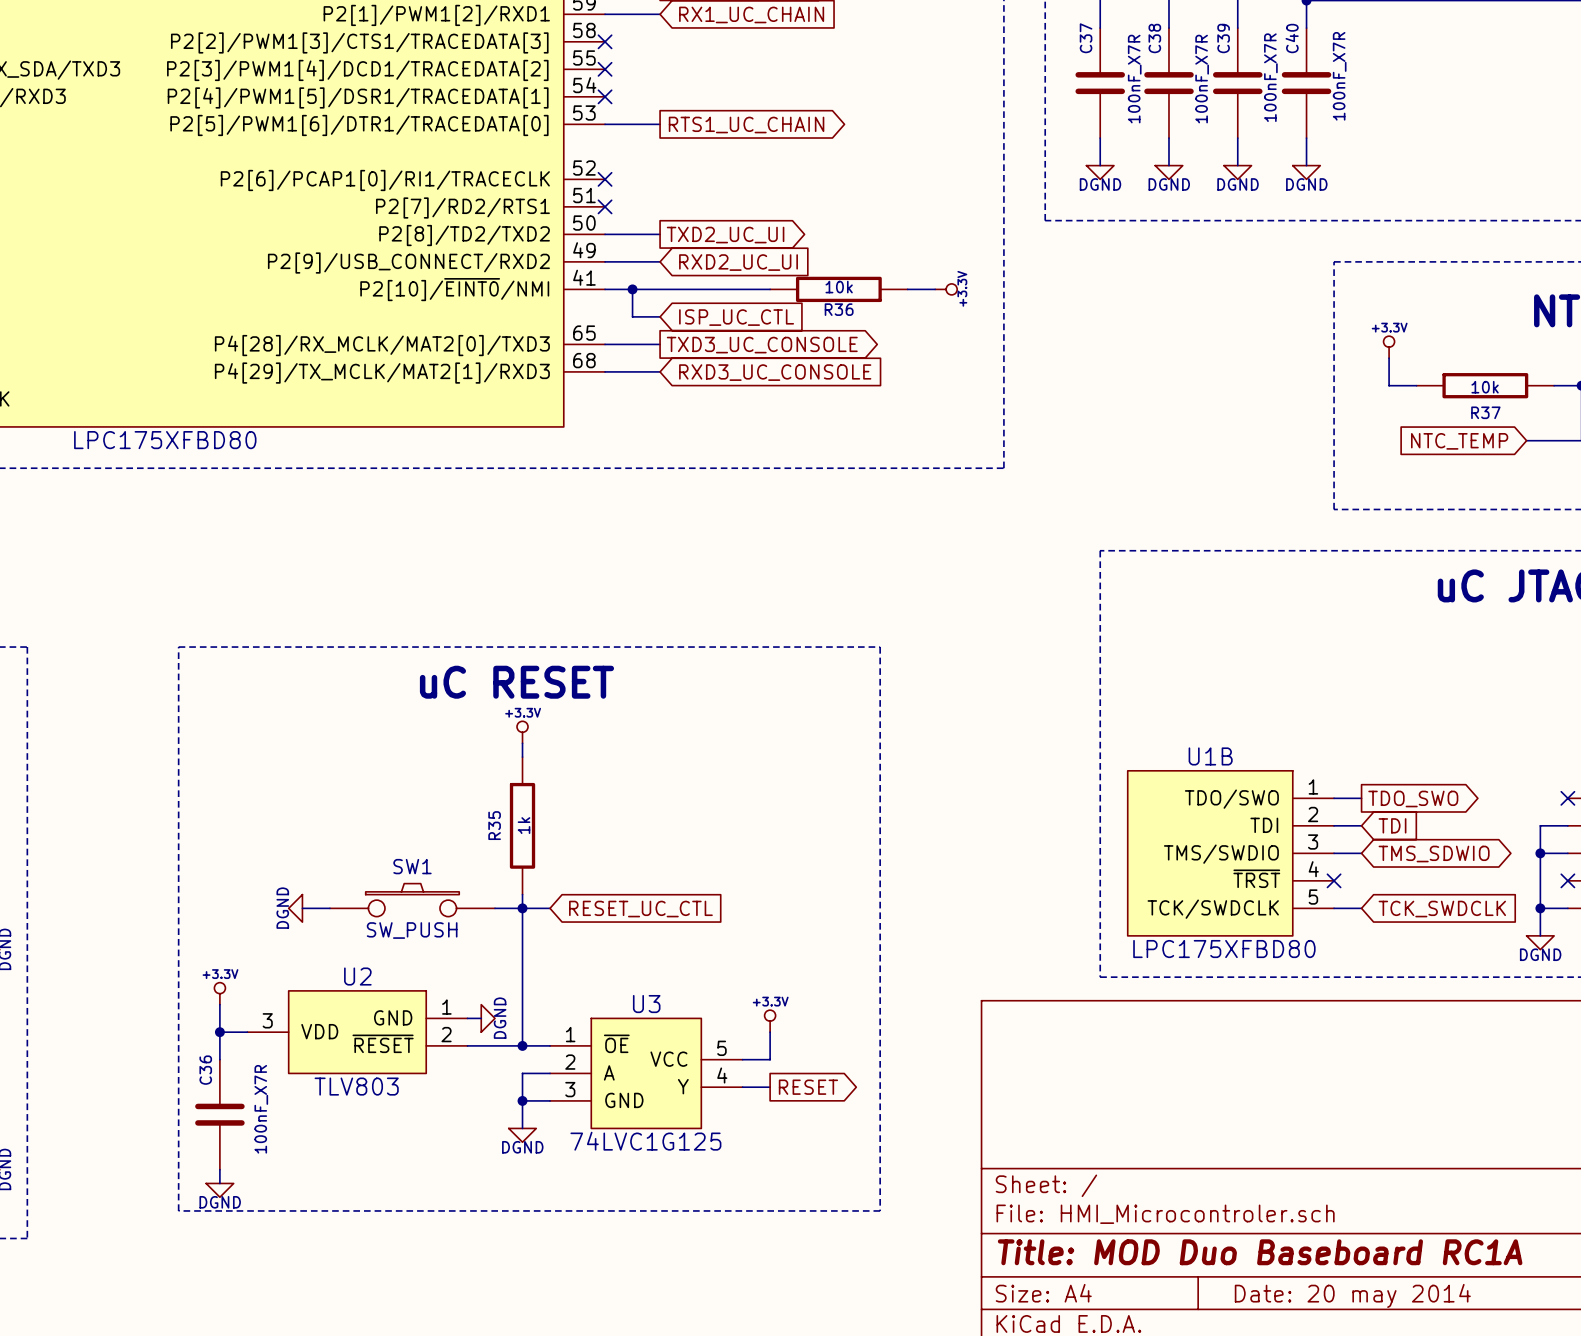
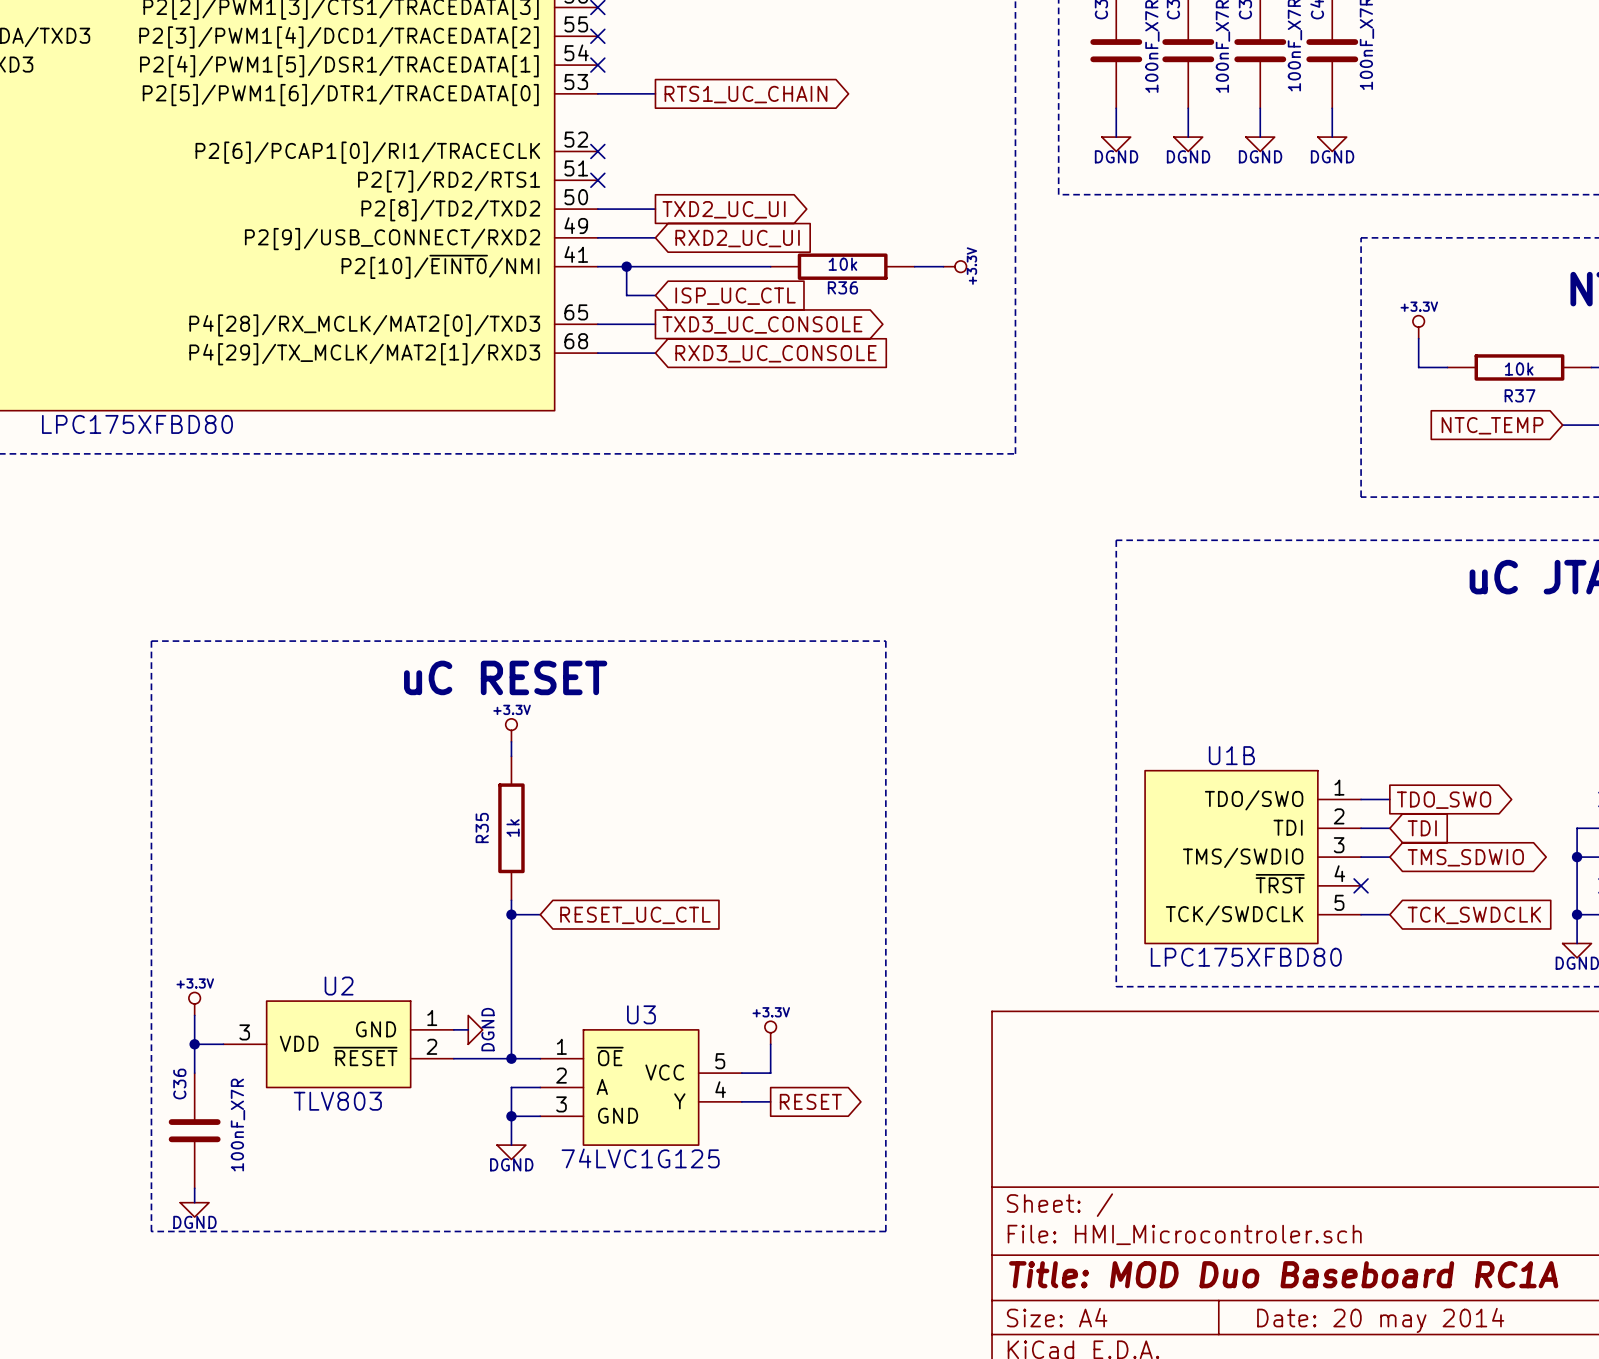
SW1: SW_PUSH (412, 900) -> none
power symbol: DGND (295, 908) -> none
wire: (302, 908) (329, 908) -> none
wire: (495, 908) (522, 908) -> none

